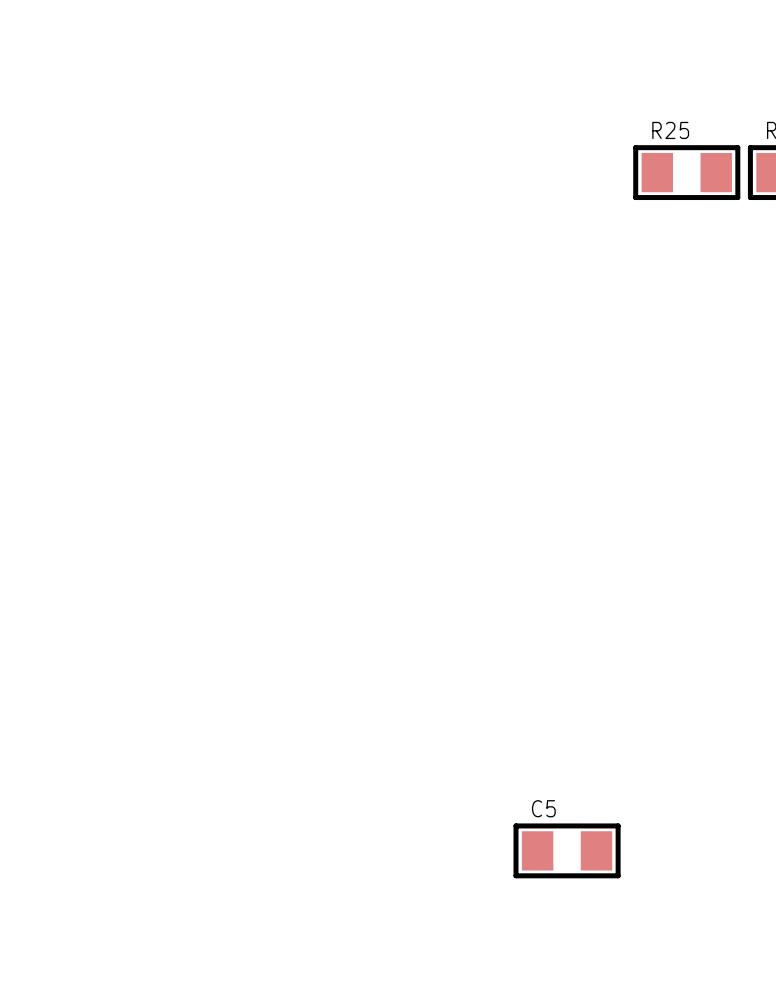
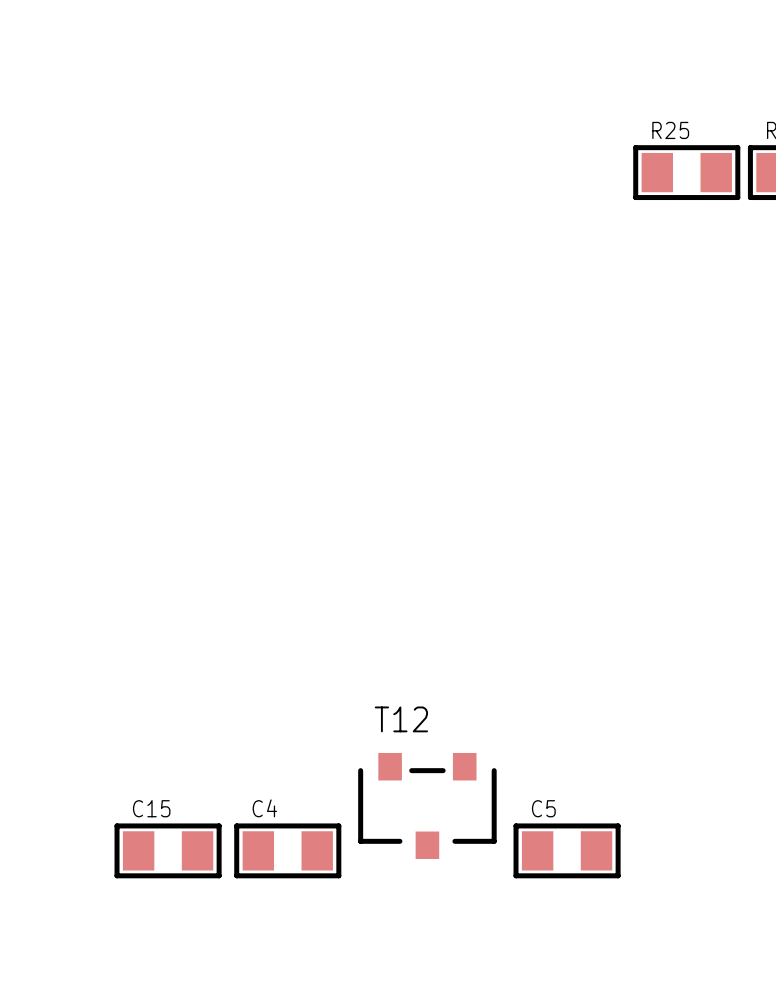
T12: none -> (427, 805)
C15: none -> (168, 850)
C4: none -> (287, 850)

